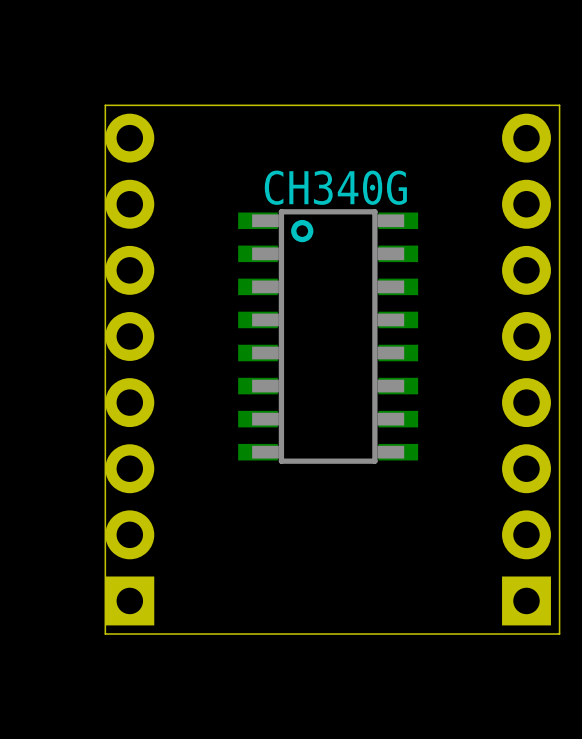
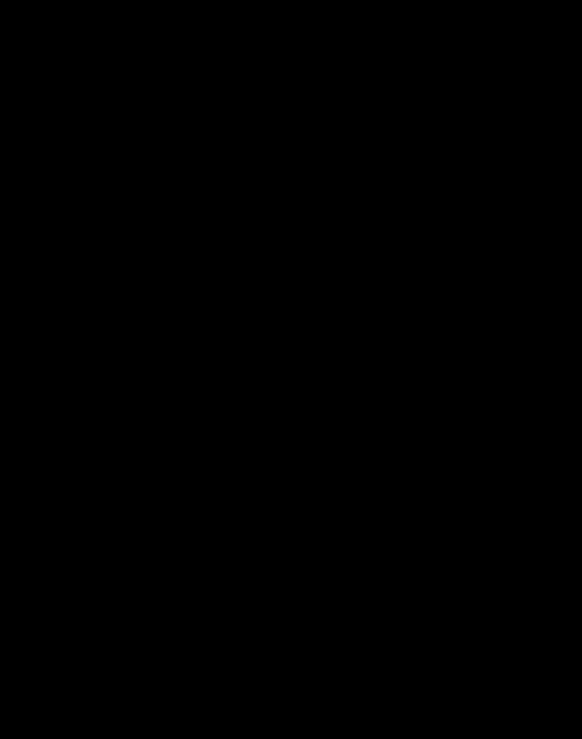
board edge: (559, 105) (105, 105) (105, 634) (559, 634) (559, 105) -> none
part: (328, 336) -> none
part: (129, 369) -> none
part: (526, 369) -> none

